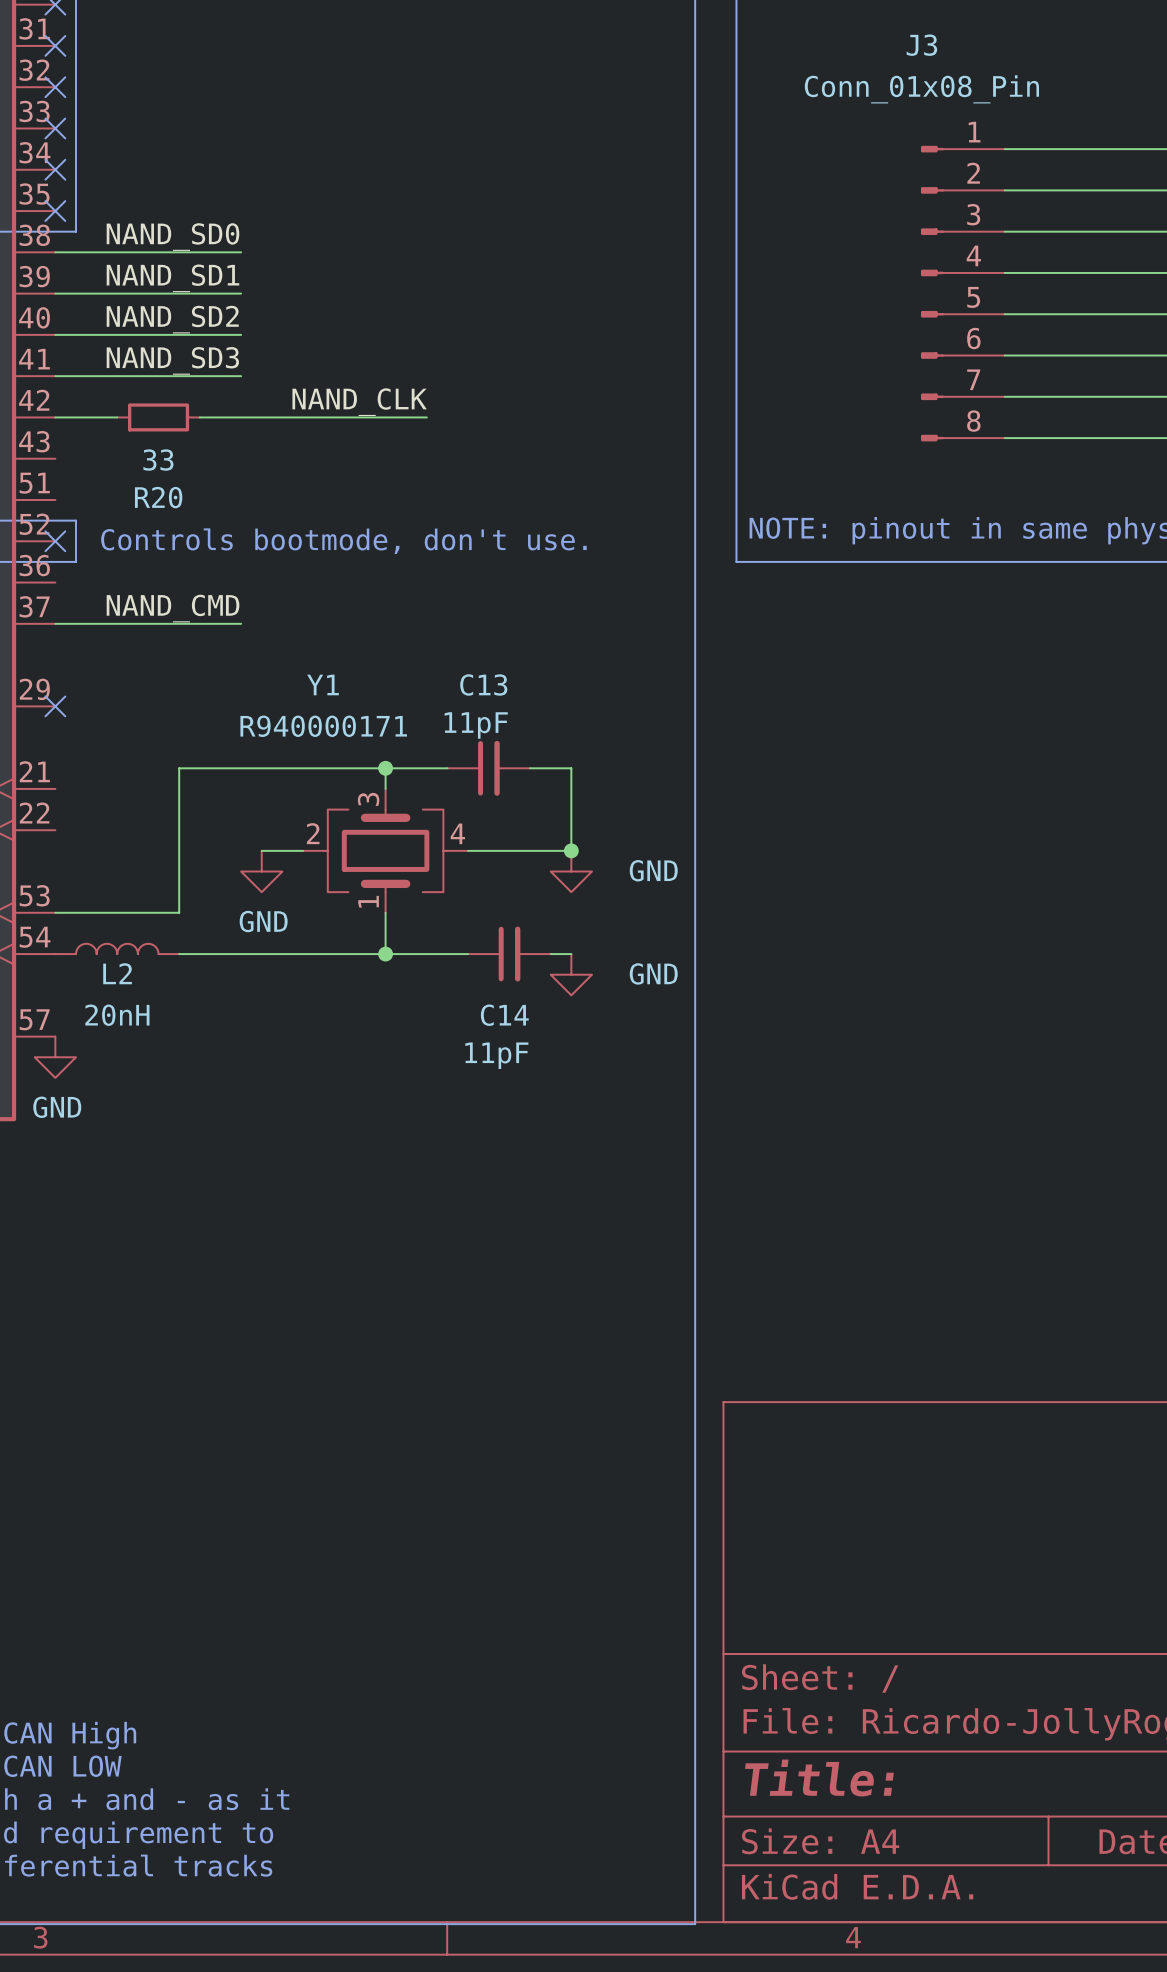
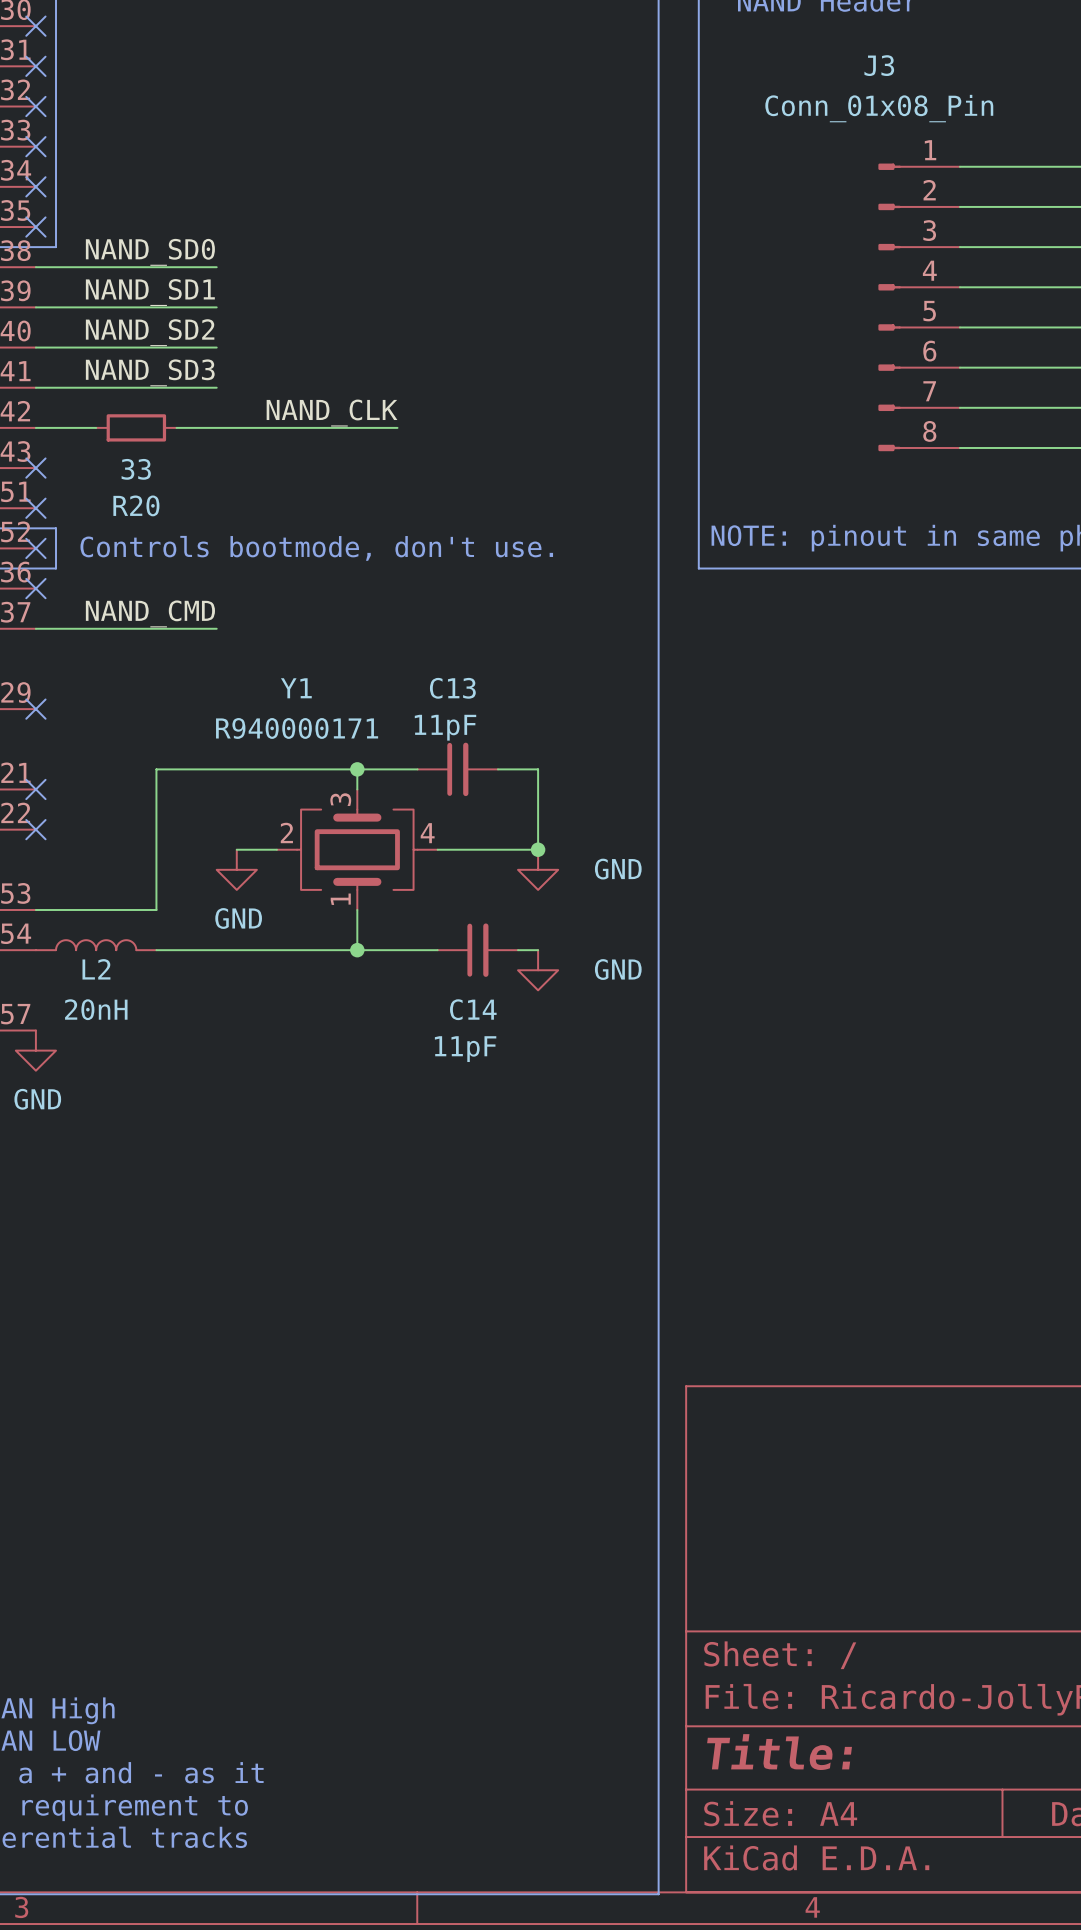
no-connect mark: none -> (35, 468)
no-connect mark: none -> (35, 508)
no-connect mark: none -> (35, 588)
no-connect mark: none -> (35, 789)
no-connect mark: none -> (35, 829)

